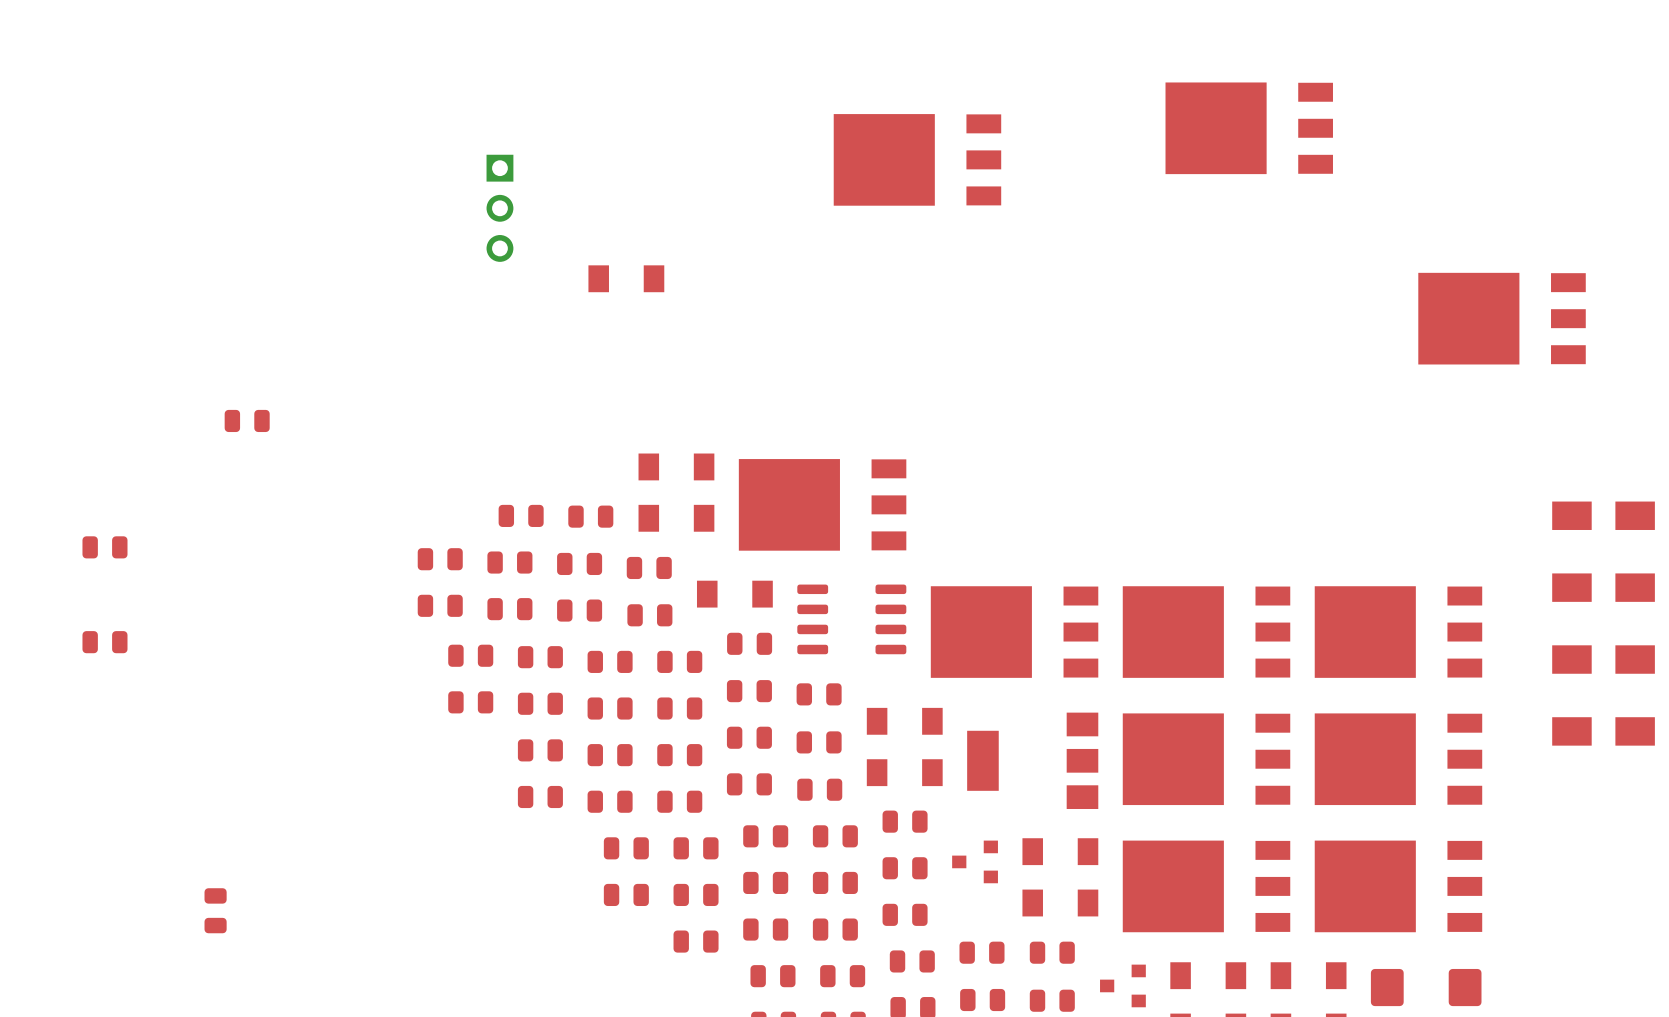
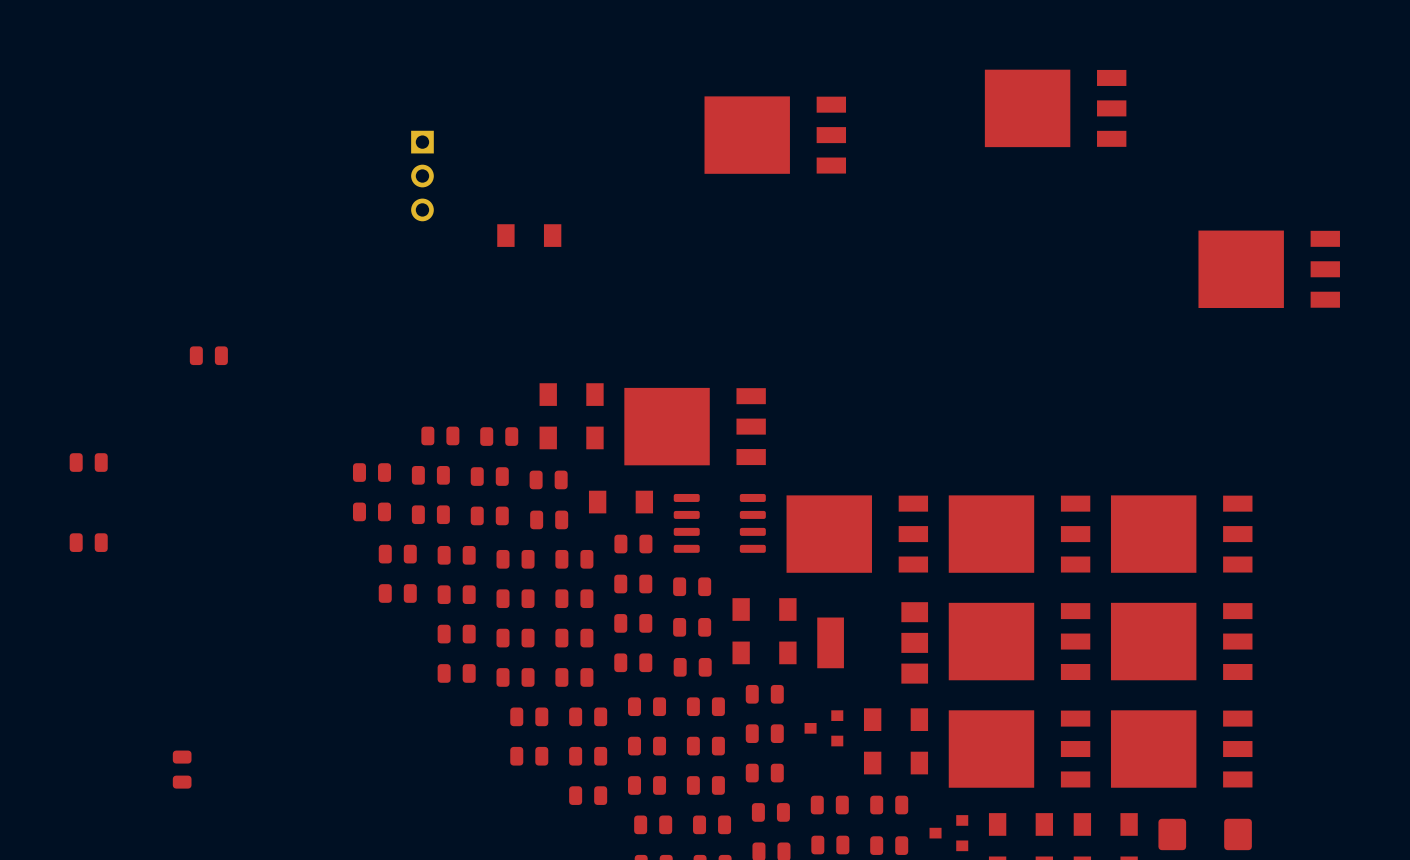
part: (1603, 515) -> none
part: (1603, 587) -> none
part: (1603, 659) -> none
part: (1603, 731) -> none

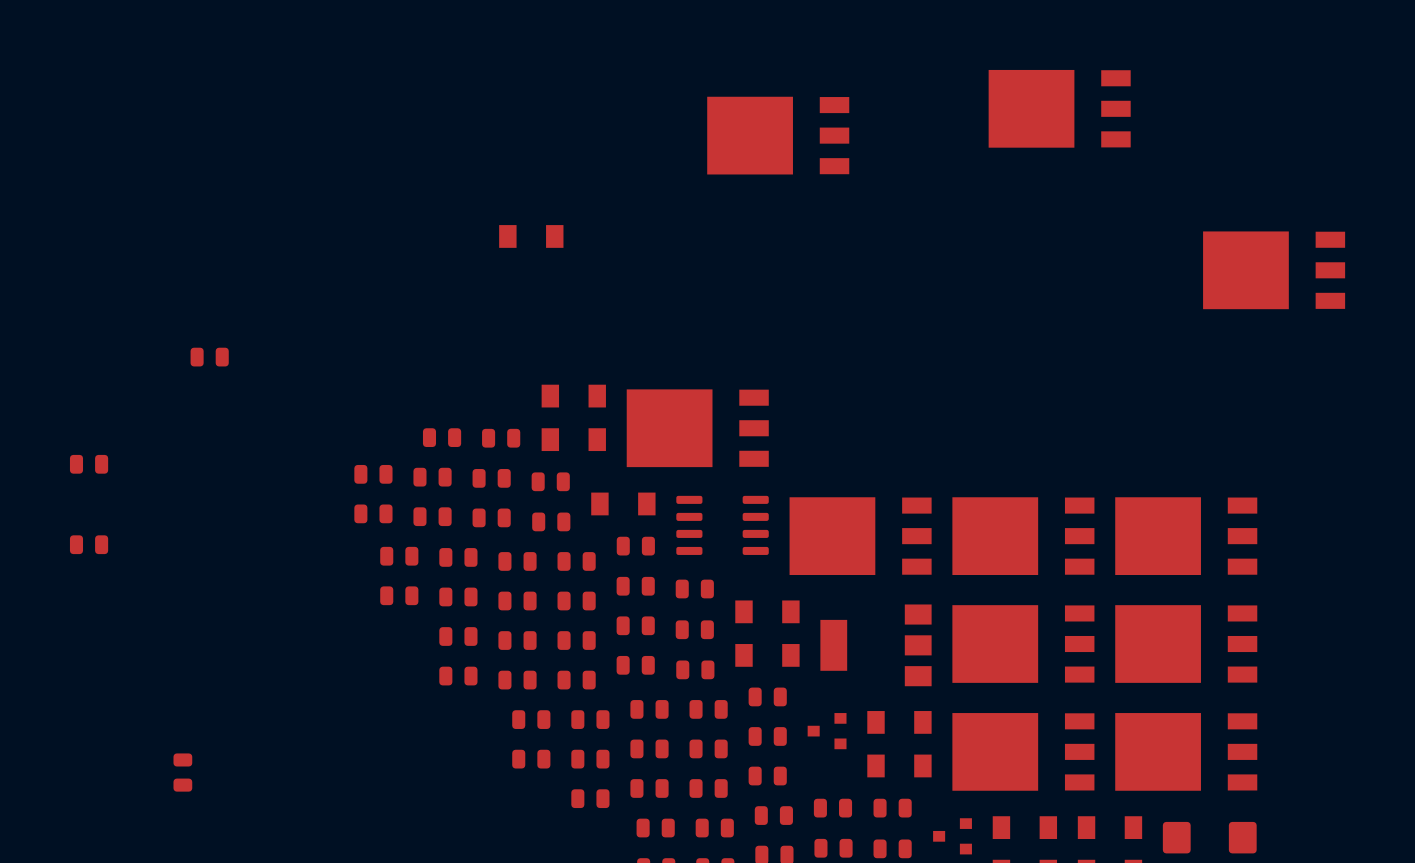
part: (422, 176) -> none

